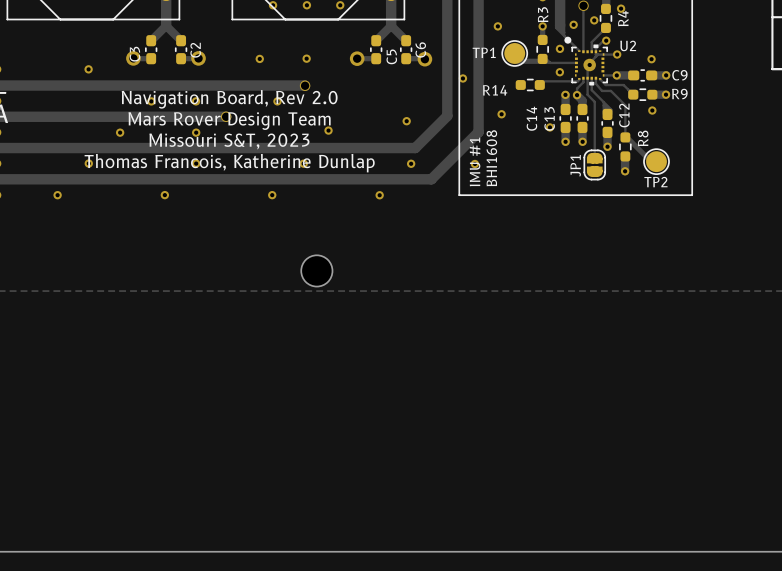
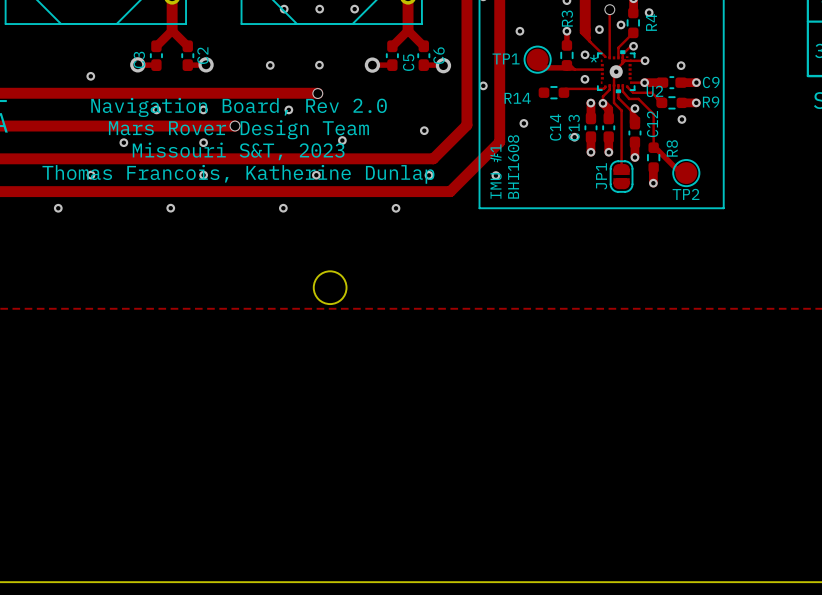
drawing: [564, 36, 572, 44] -> none
U2 name position: U2 (628, 45) -> U2 (654, 91)
U2 text: none -> * (593, 58)
via: none -> (634, 108)

